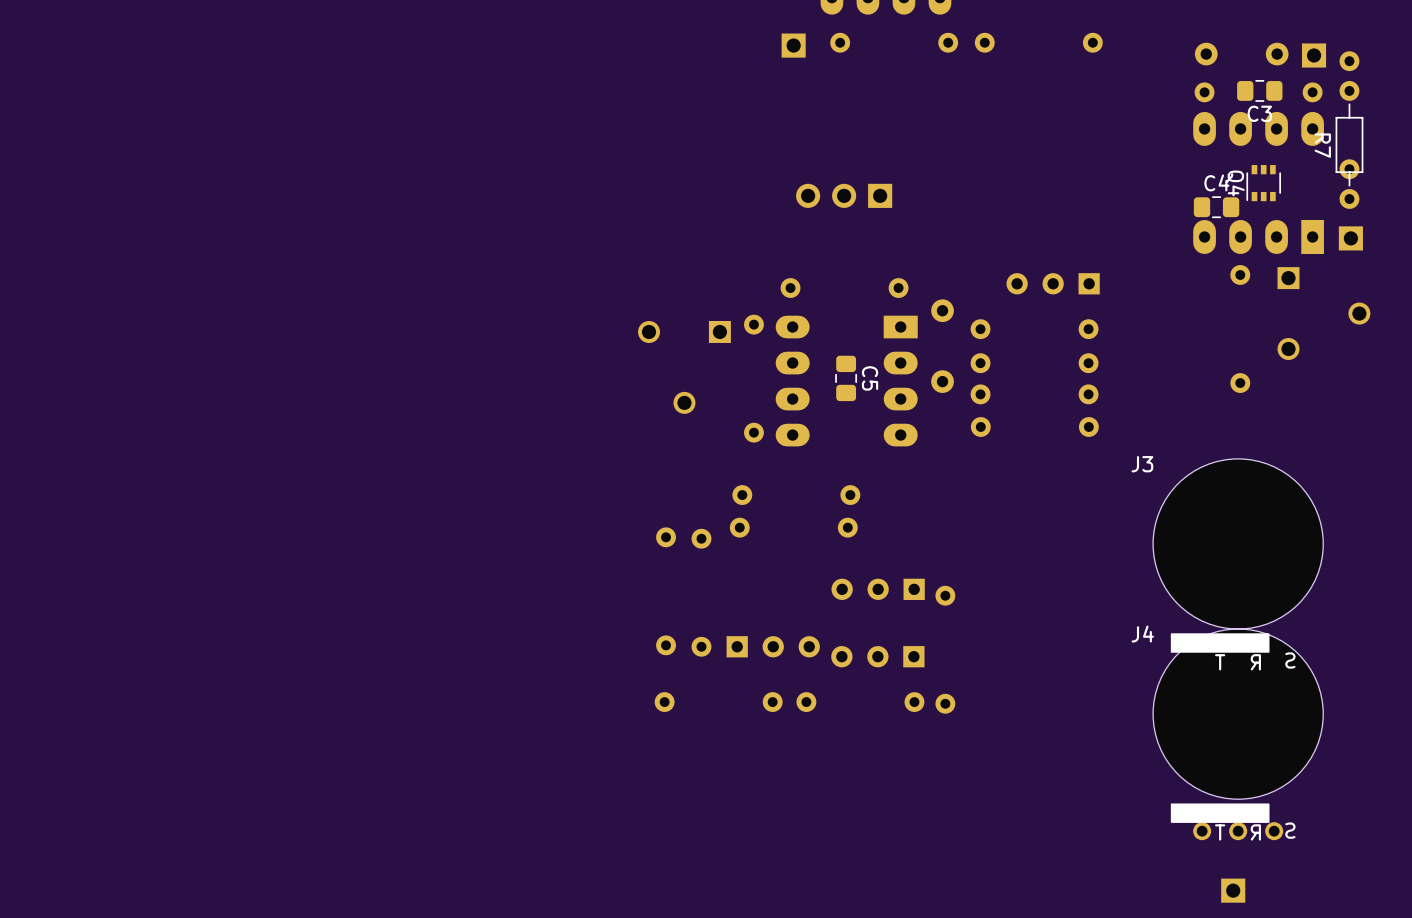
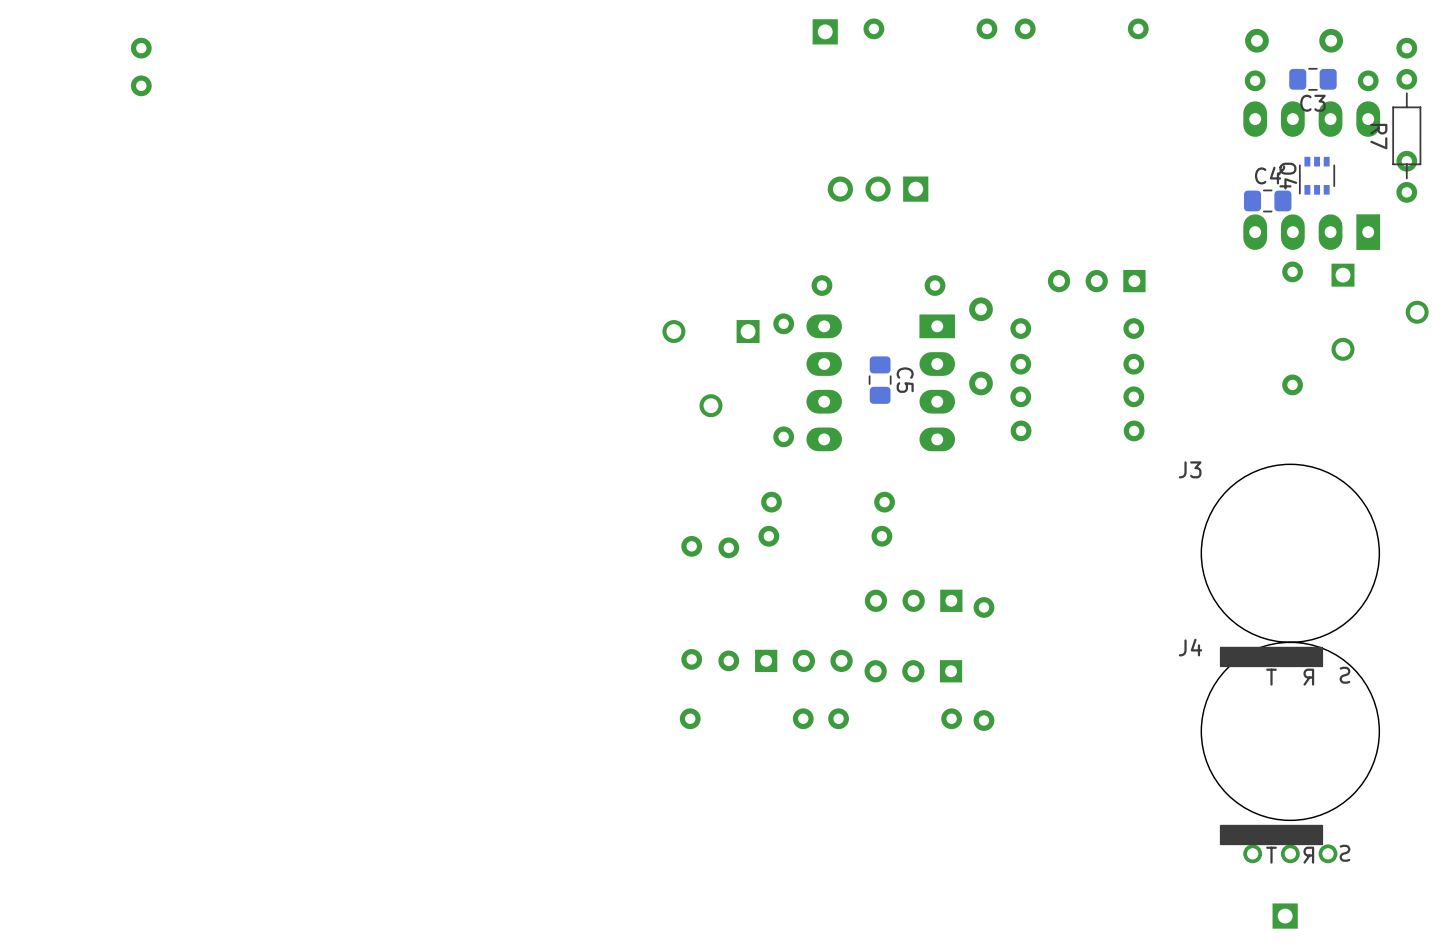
part: (1314, 55) -> none
part: none -> (141, 67)
part: (1350, 238) -> none

